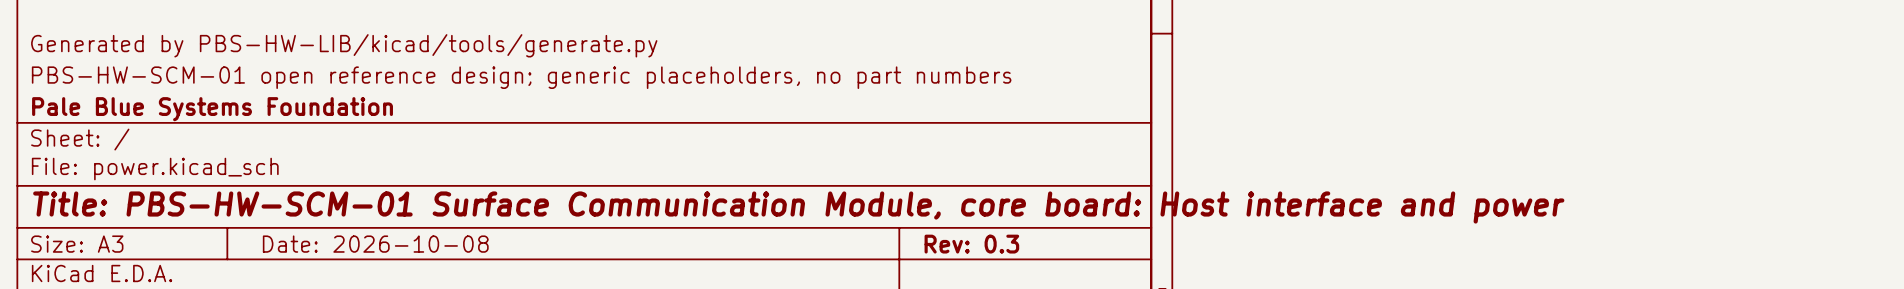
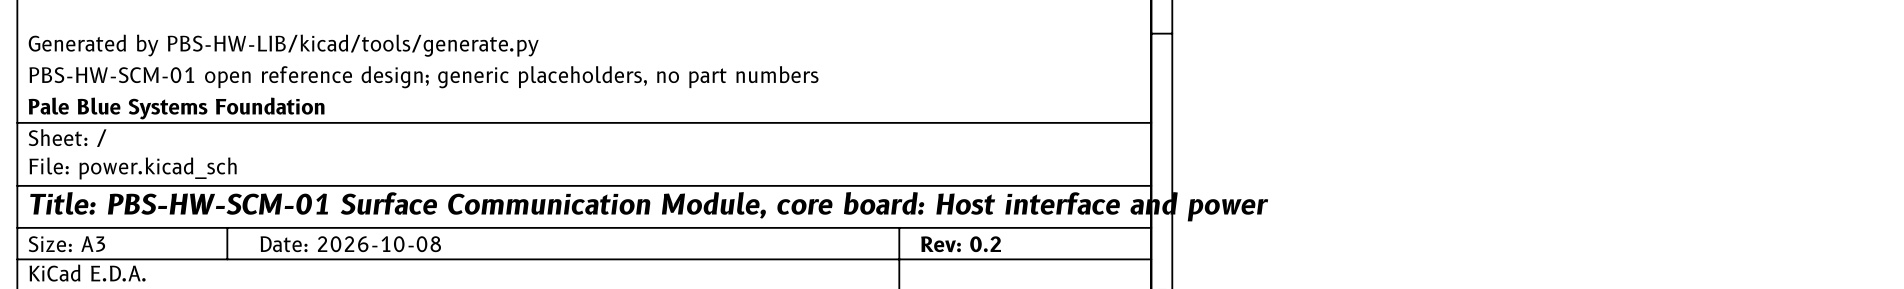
title block: Rev: 0.3 (971, 244) -> Rev: 0.2 (961, 244)

